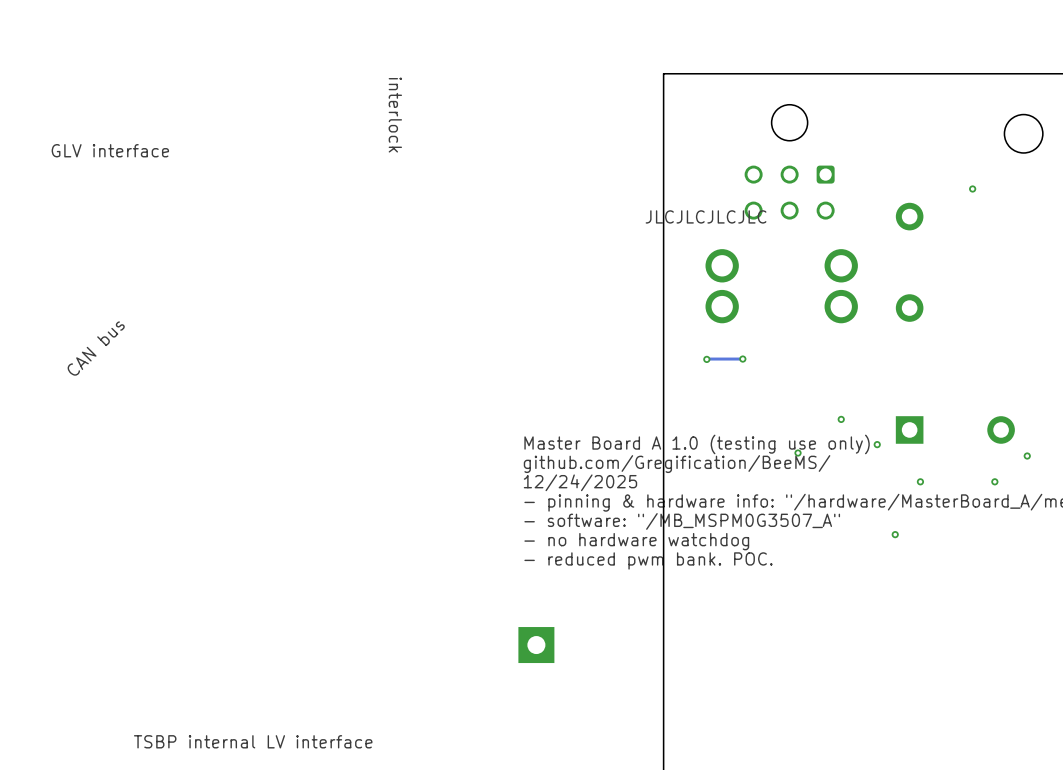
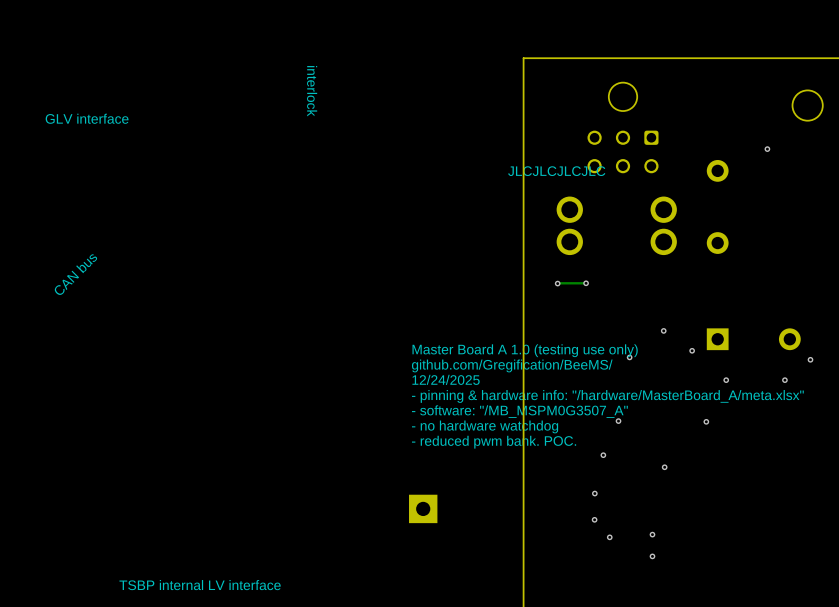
via: none -> (618, 421)
via: none -> (603, 455)
via: none -> (664, 467)
via: none -> (594, 493)
via: none -> (594, 519)
via: none -> (652, 534)
via: none -> (609, 537)
via: none -> (652, 556)

